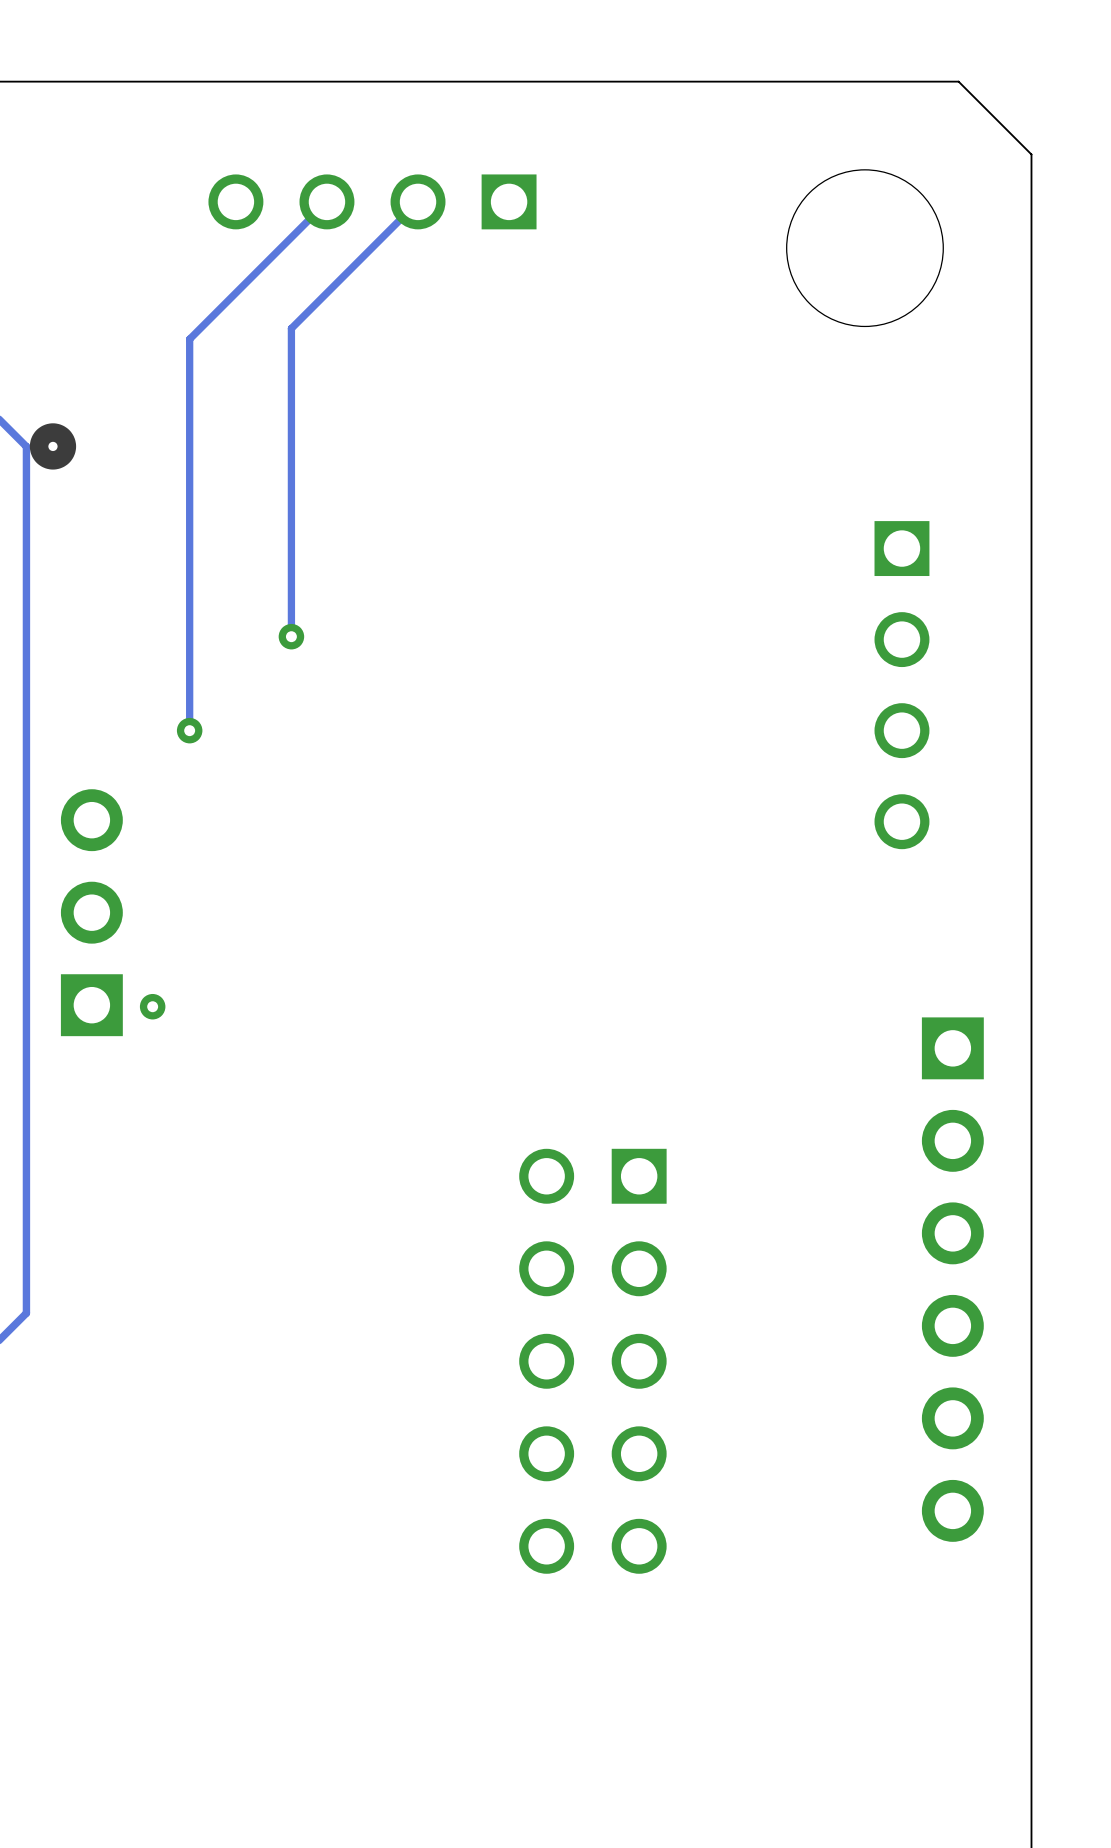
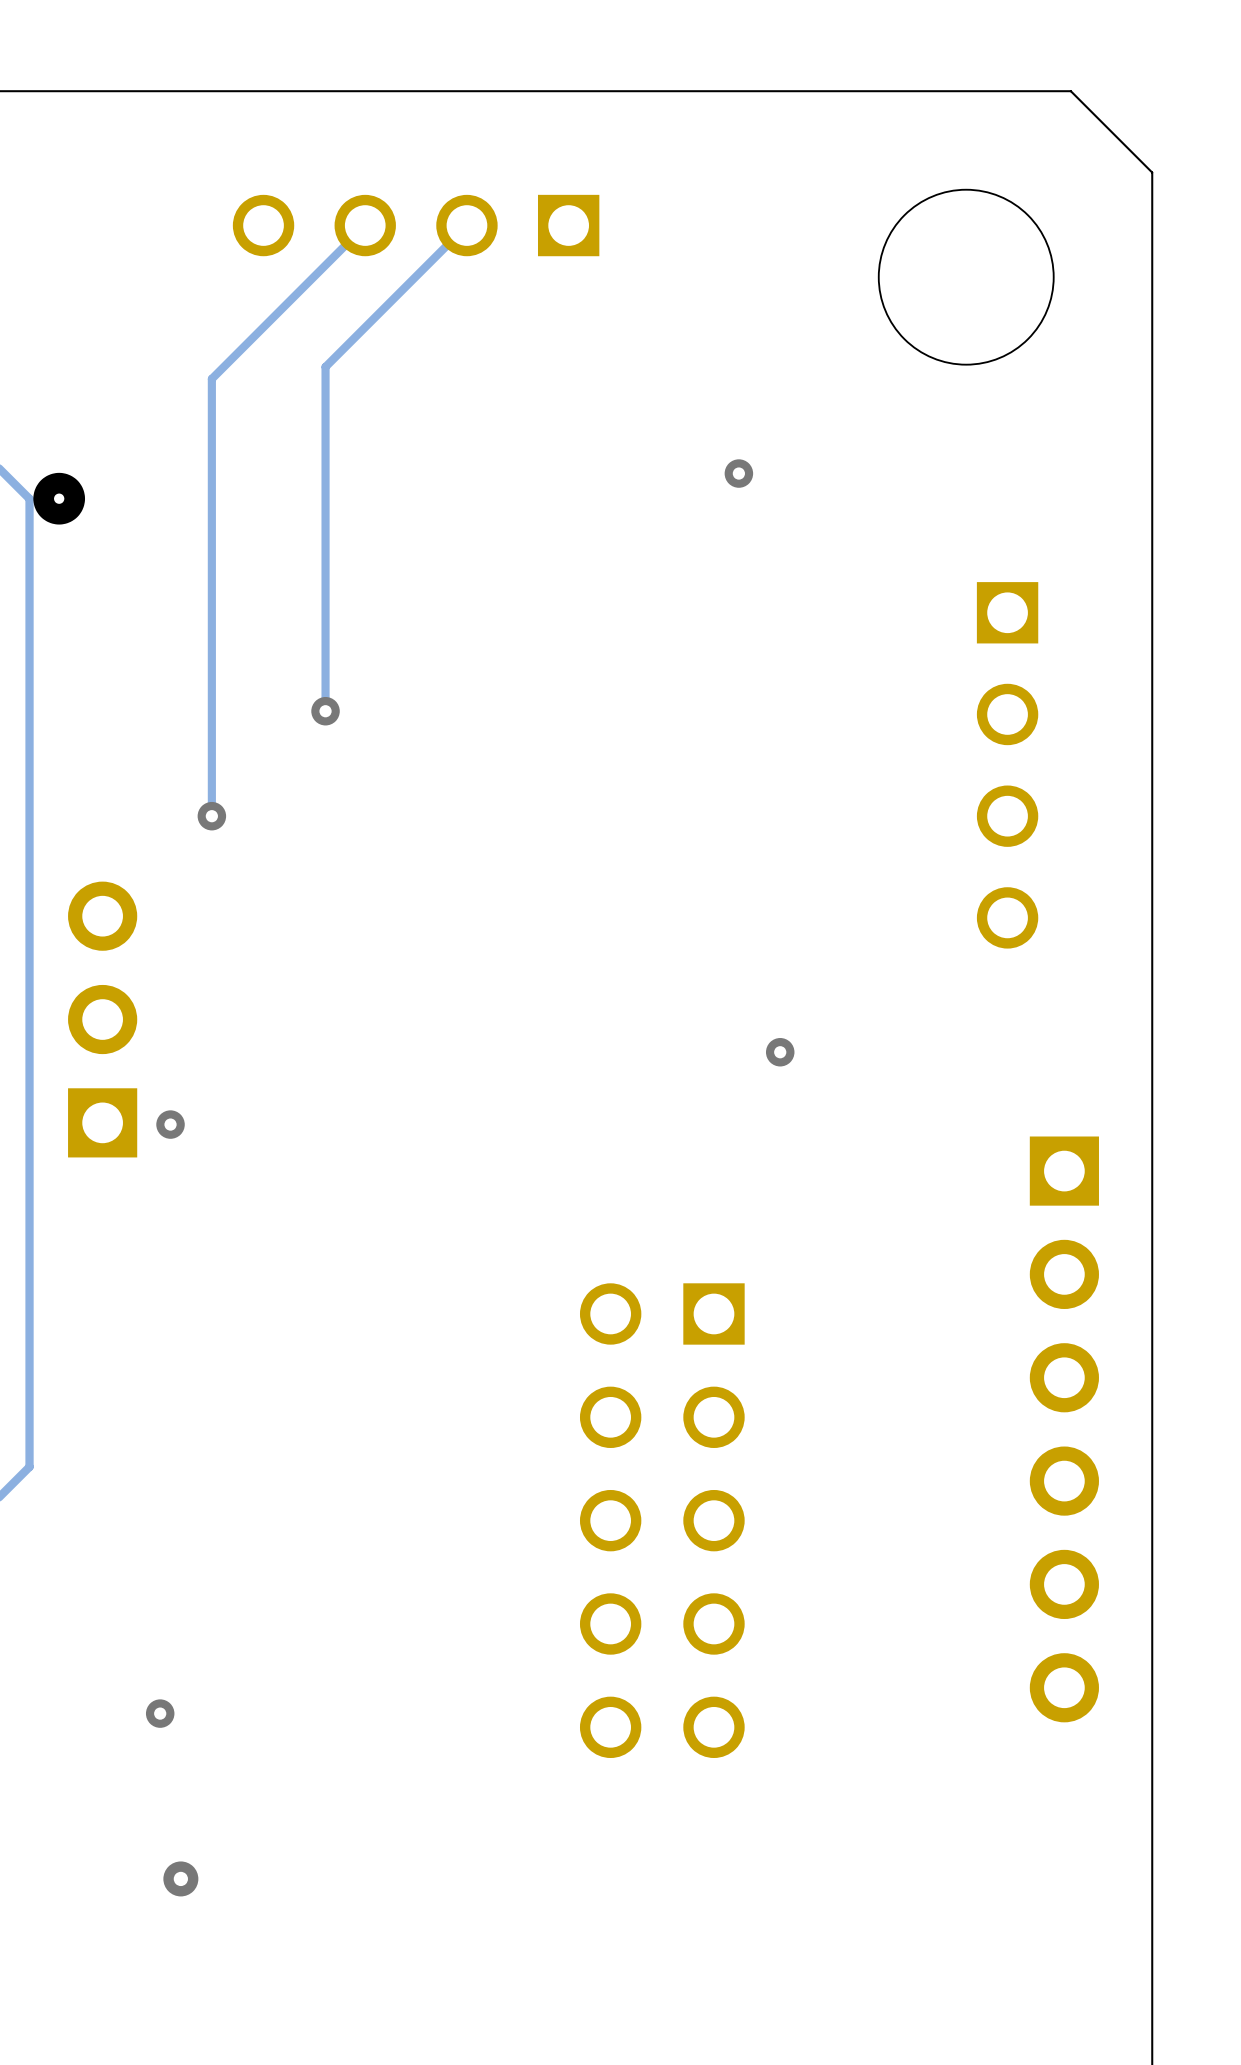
via: none -> (738, 473)
via: none -> (780, 1052)
via: none -> (160, 1713)
via: none -> (180, 1878)

